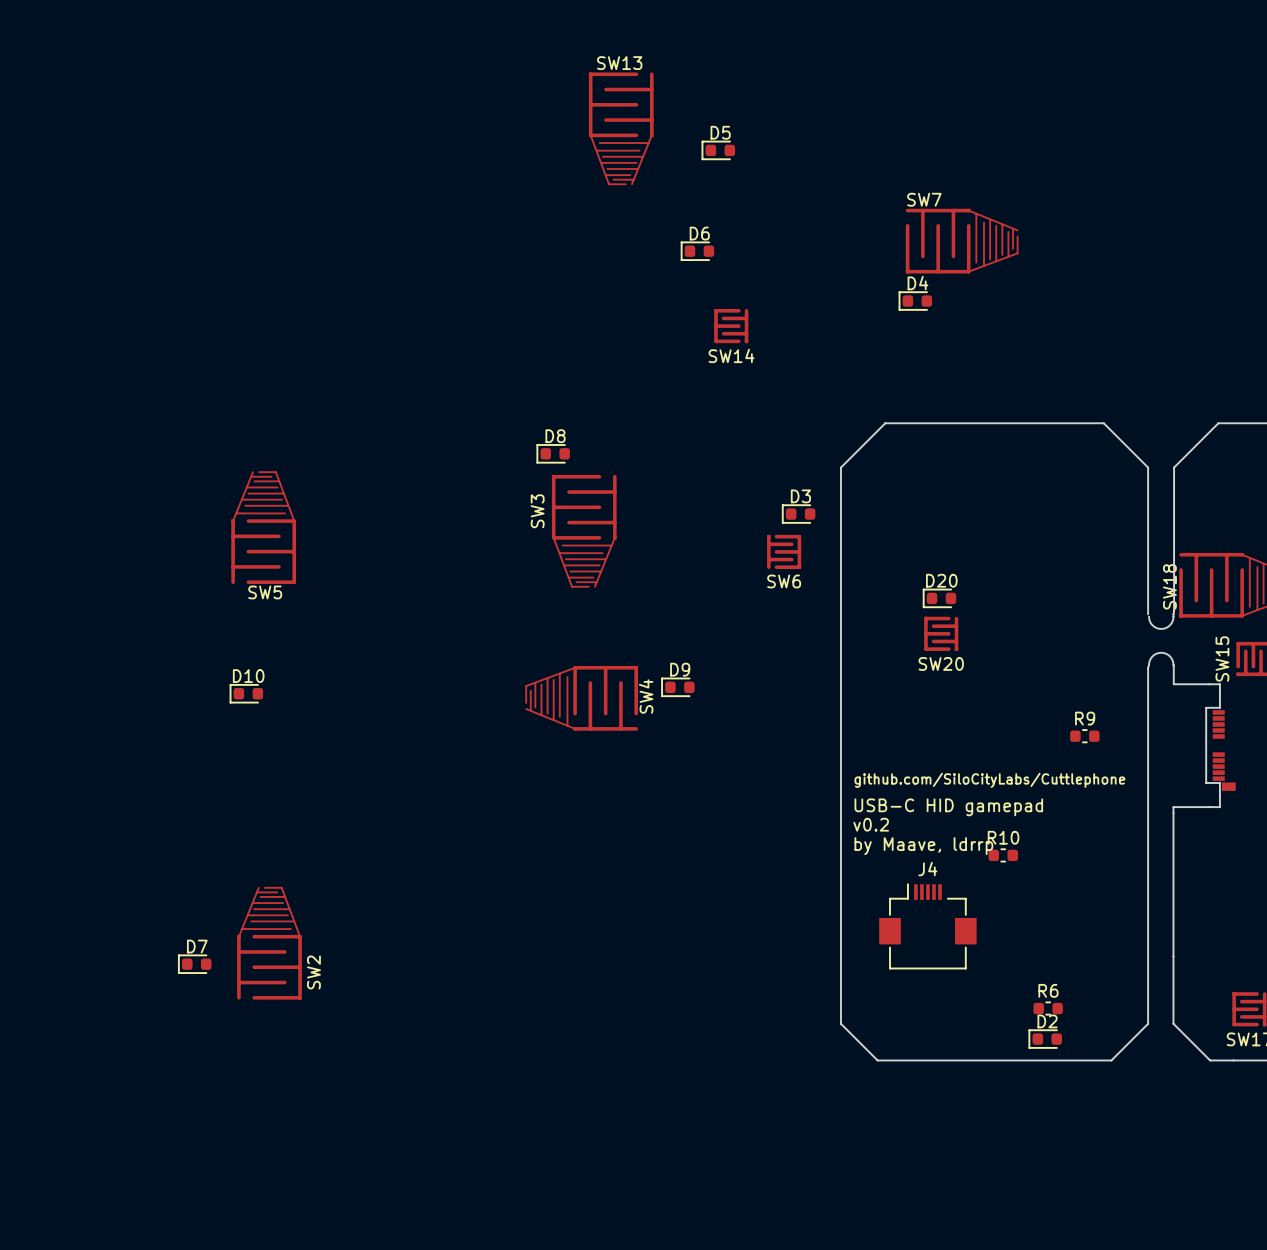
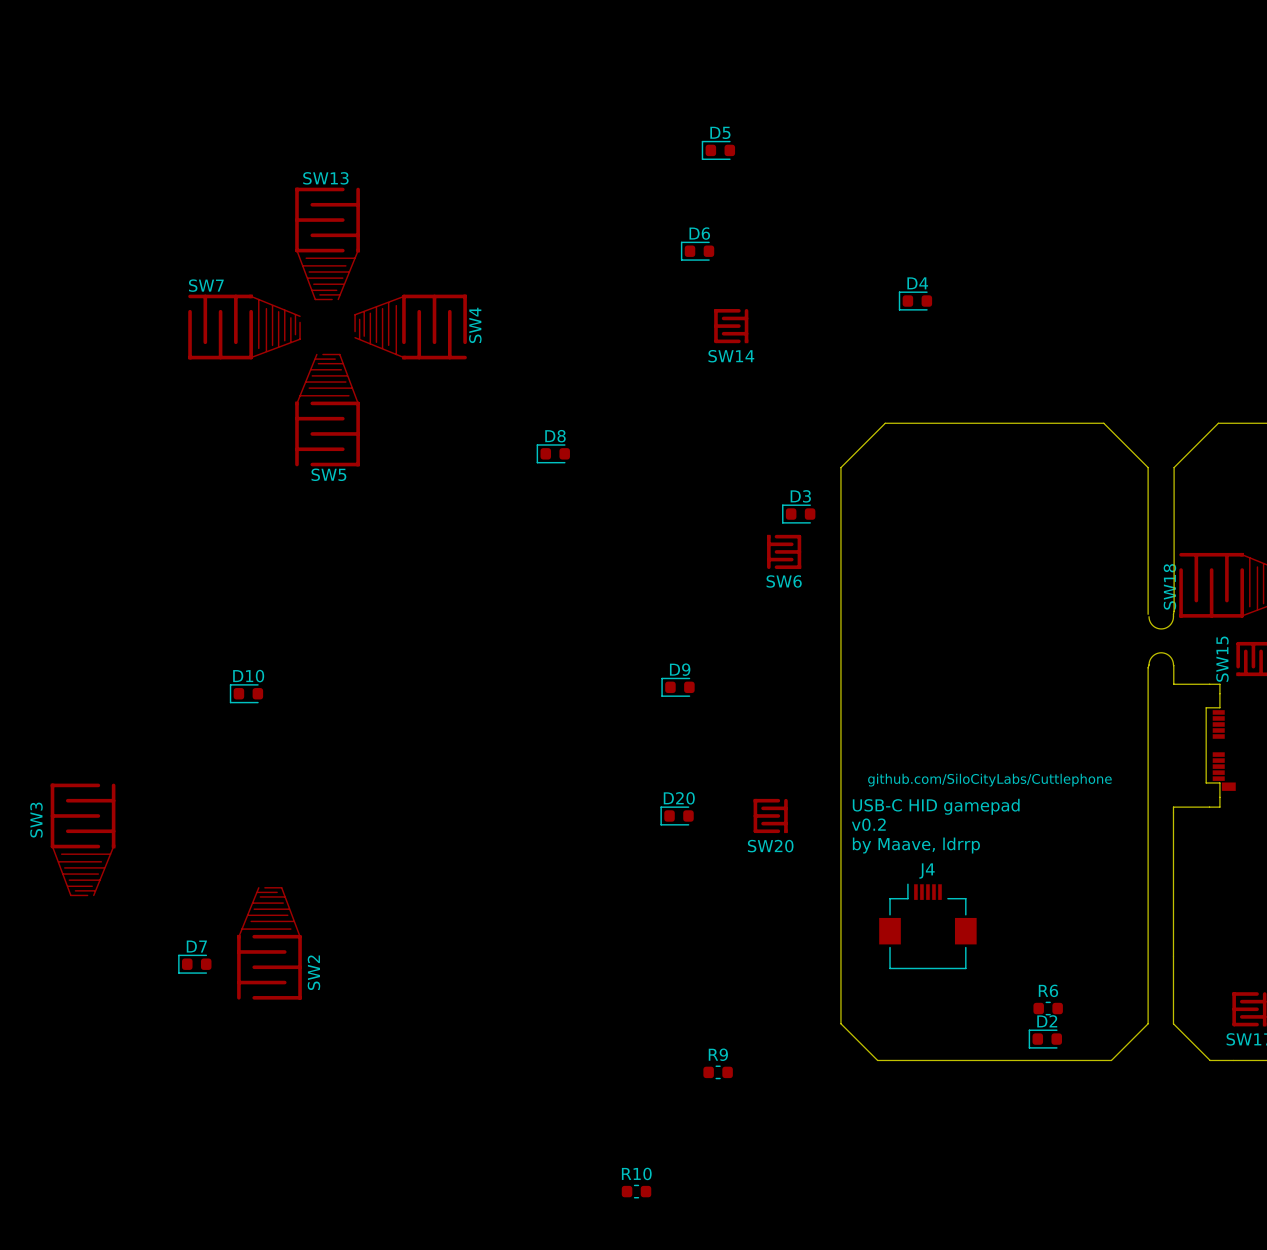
SW13 position: (621, 128) -> (327, 243)
SW7 position: (962, 241) -> (244, 327)
SW5 position: (263, 527) -> (327, 410)
SW3 position: (584, 531) -> (83, 839)
D20 position: (939, 598) -> (677, 815)
SW20 position: (941, 633) -> (770, 815)
SW4 position: (581, 698) -> (410, 327)
R9 position: (1084, 736) -> (718, 1072)
R10 position: (1003, 855) -> (636, 1191)

